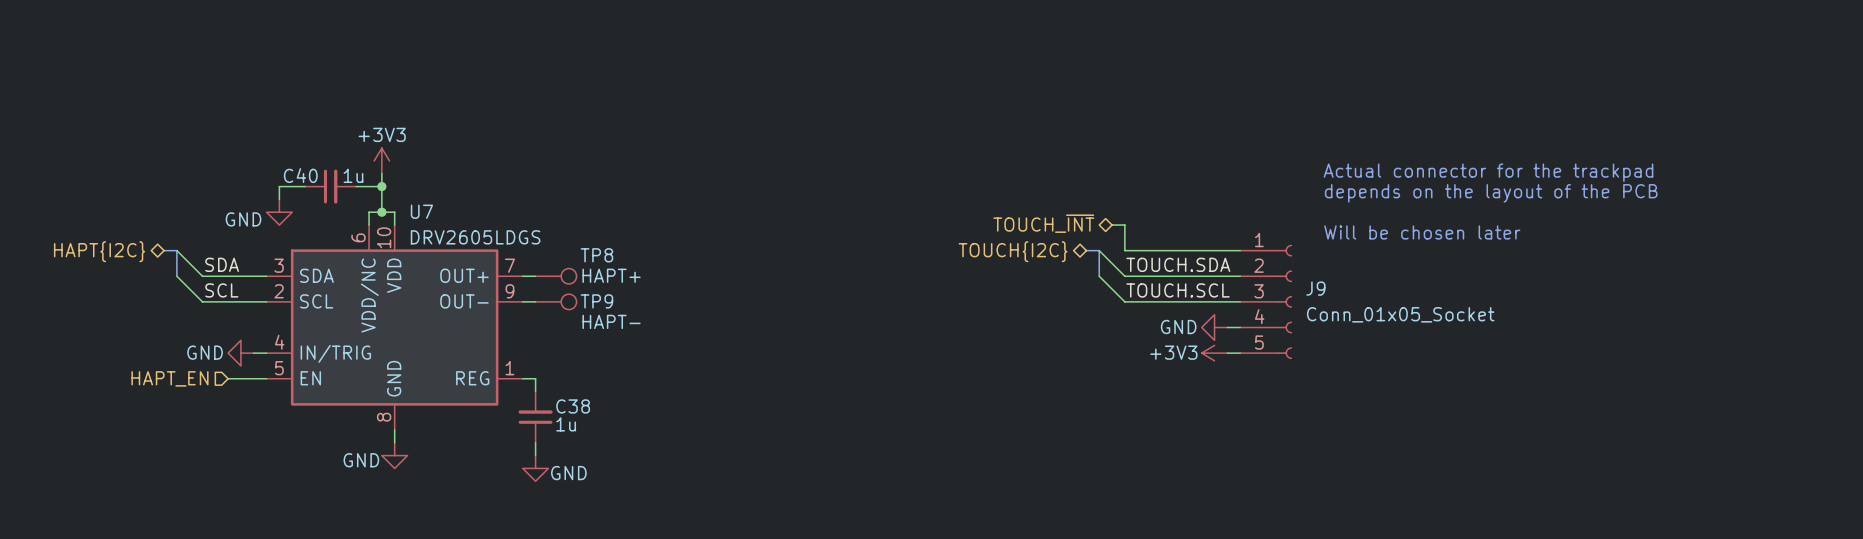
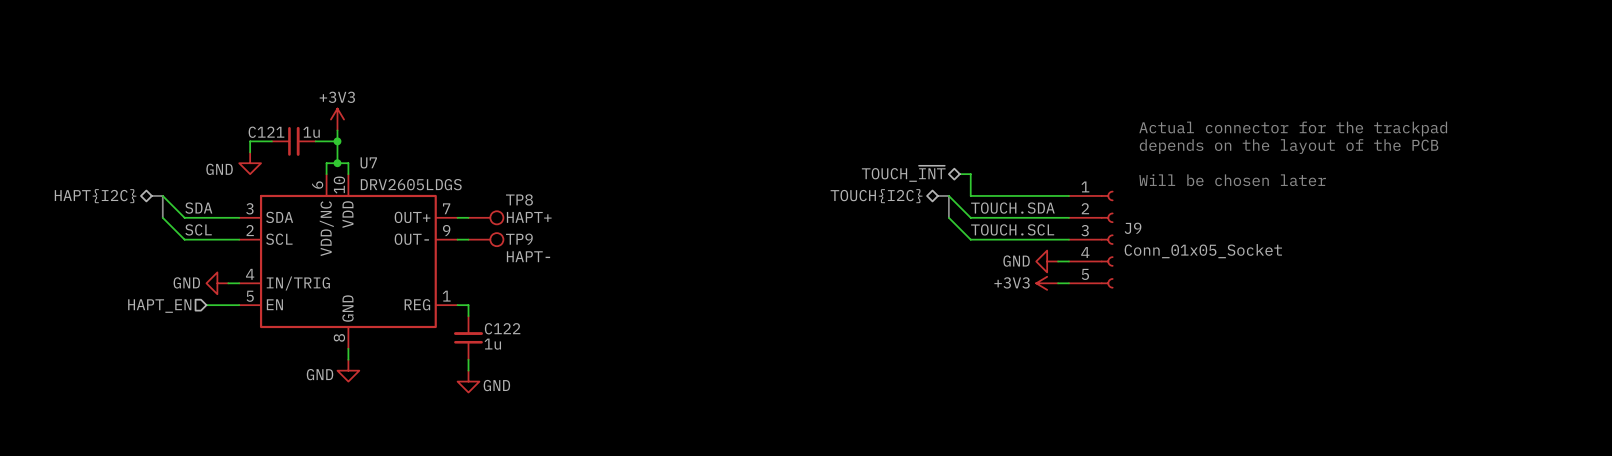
C40 name: C40 (300, 175) -> C121 (266, 132)
C38 name: C38 (573, 406) -> C122 (502, 328)

